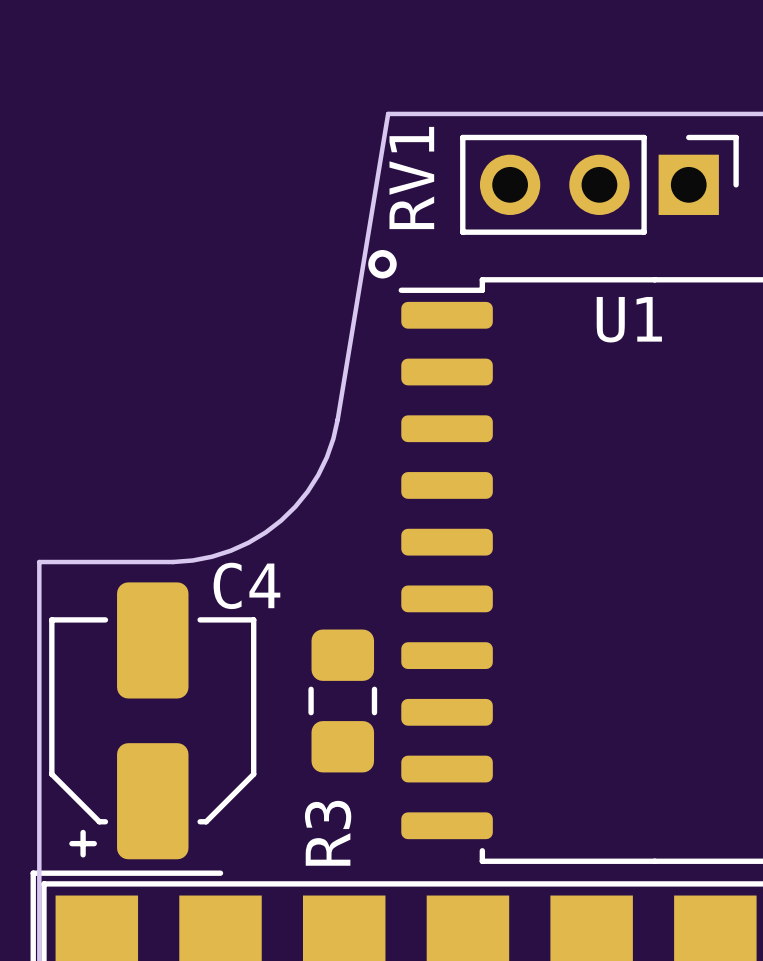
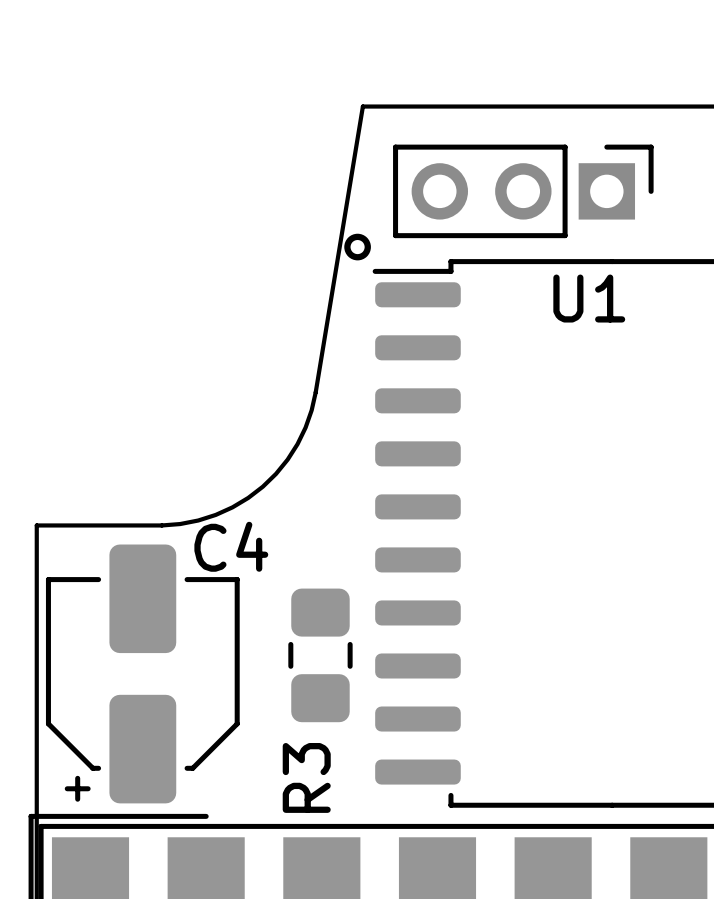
RV1 name: RV1 (411, 177) -> none
RV1 position: (599, 184) -> (523, 191)

